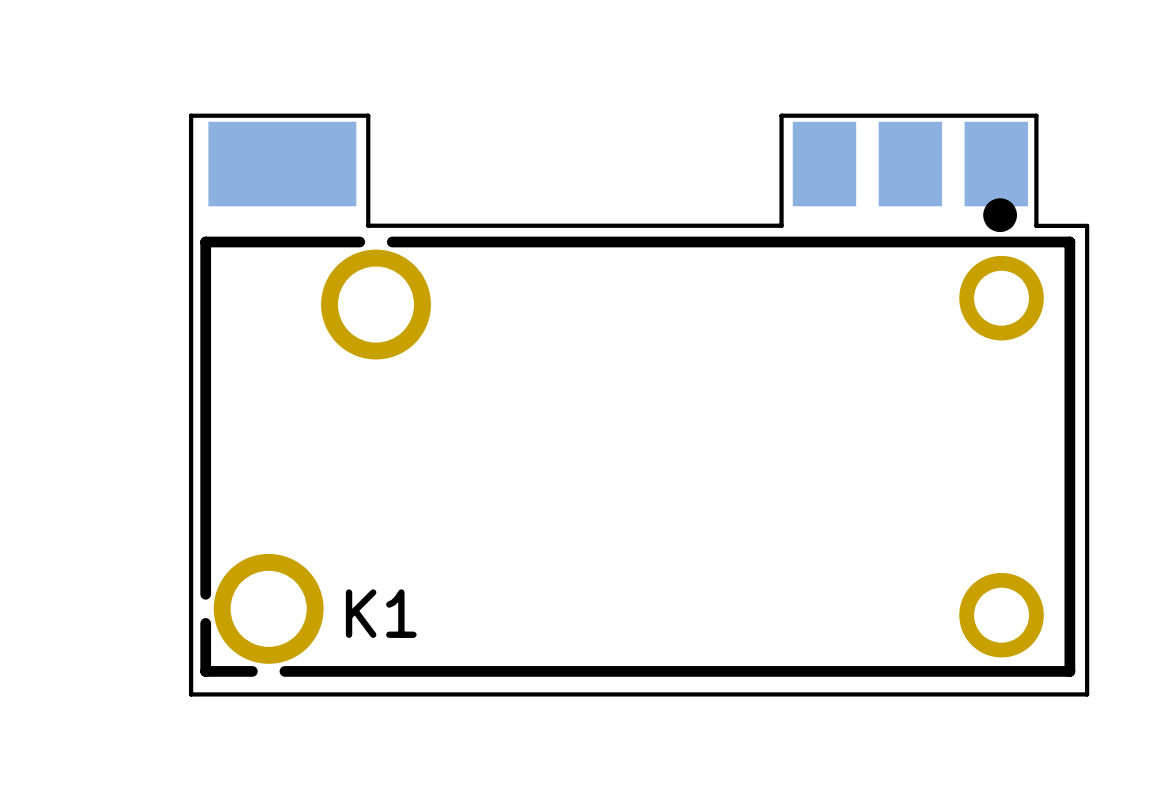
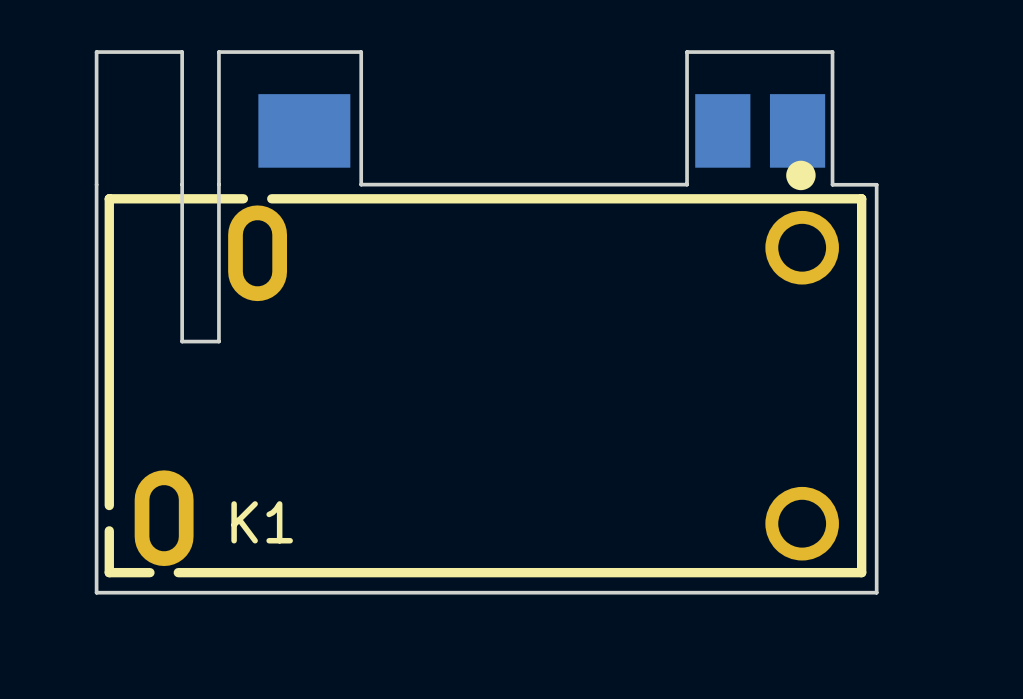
part footprint: [188, 113, 1039, 228] -> [94, 50, 835, 187]
K1 footprint: [200, 198, 1076, 677] -> [104, 160, 867, 578]
board edge: none -> (218, 184) (218, 341) (182, 341) (182, 184)

